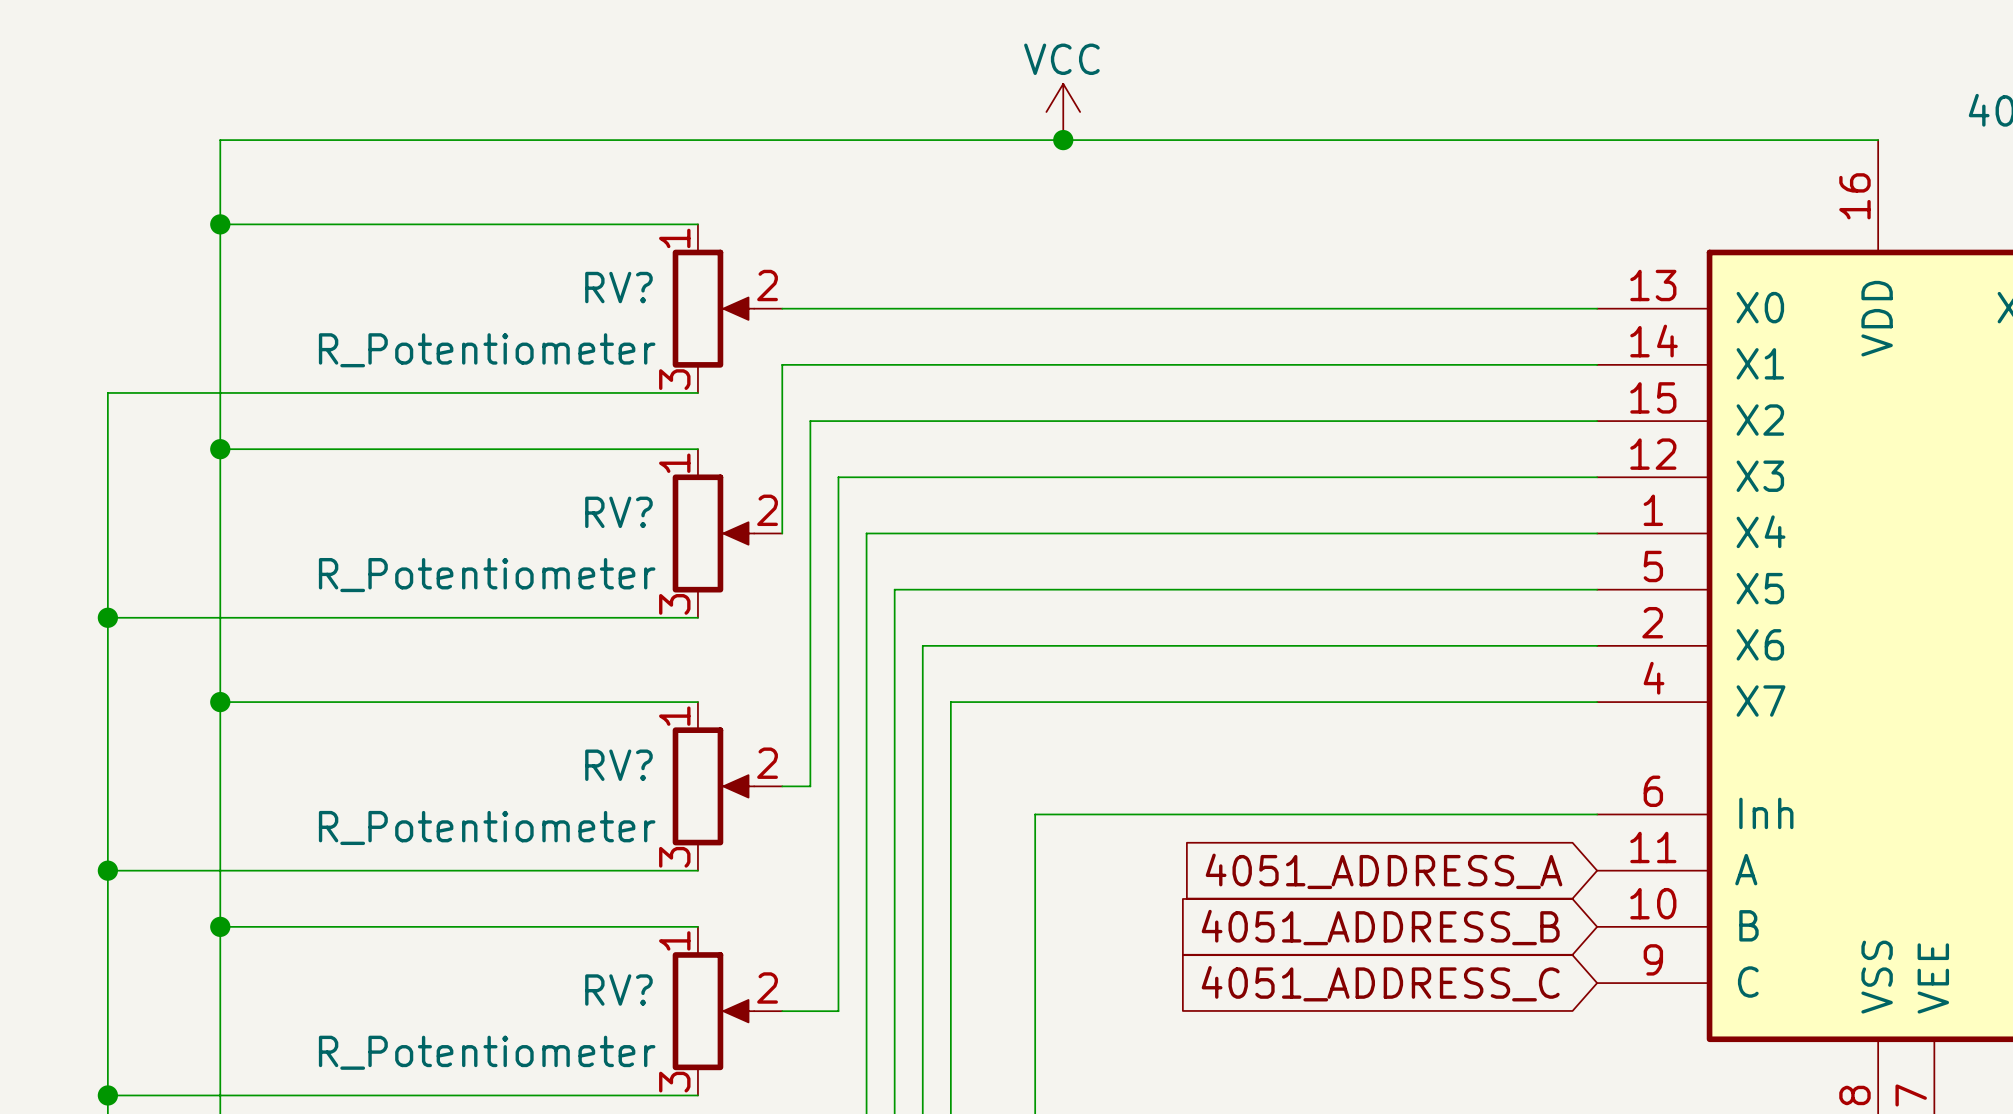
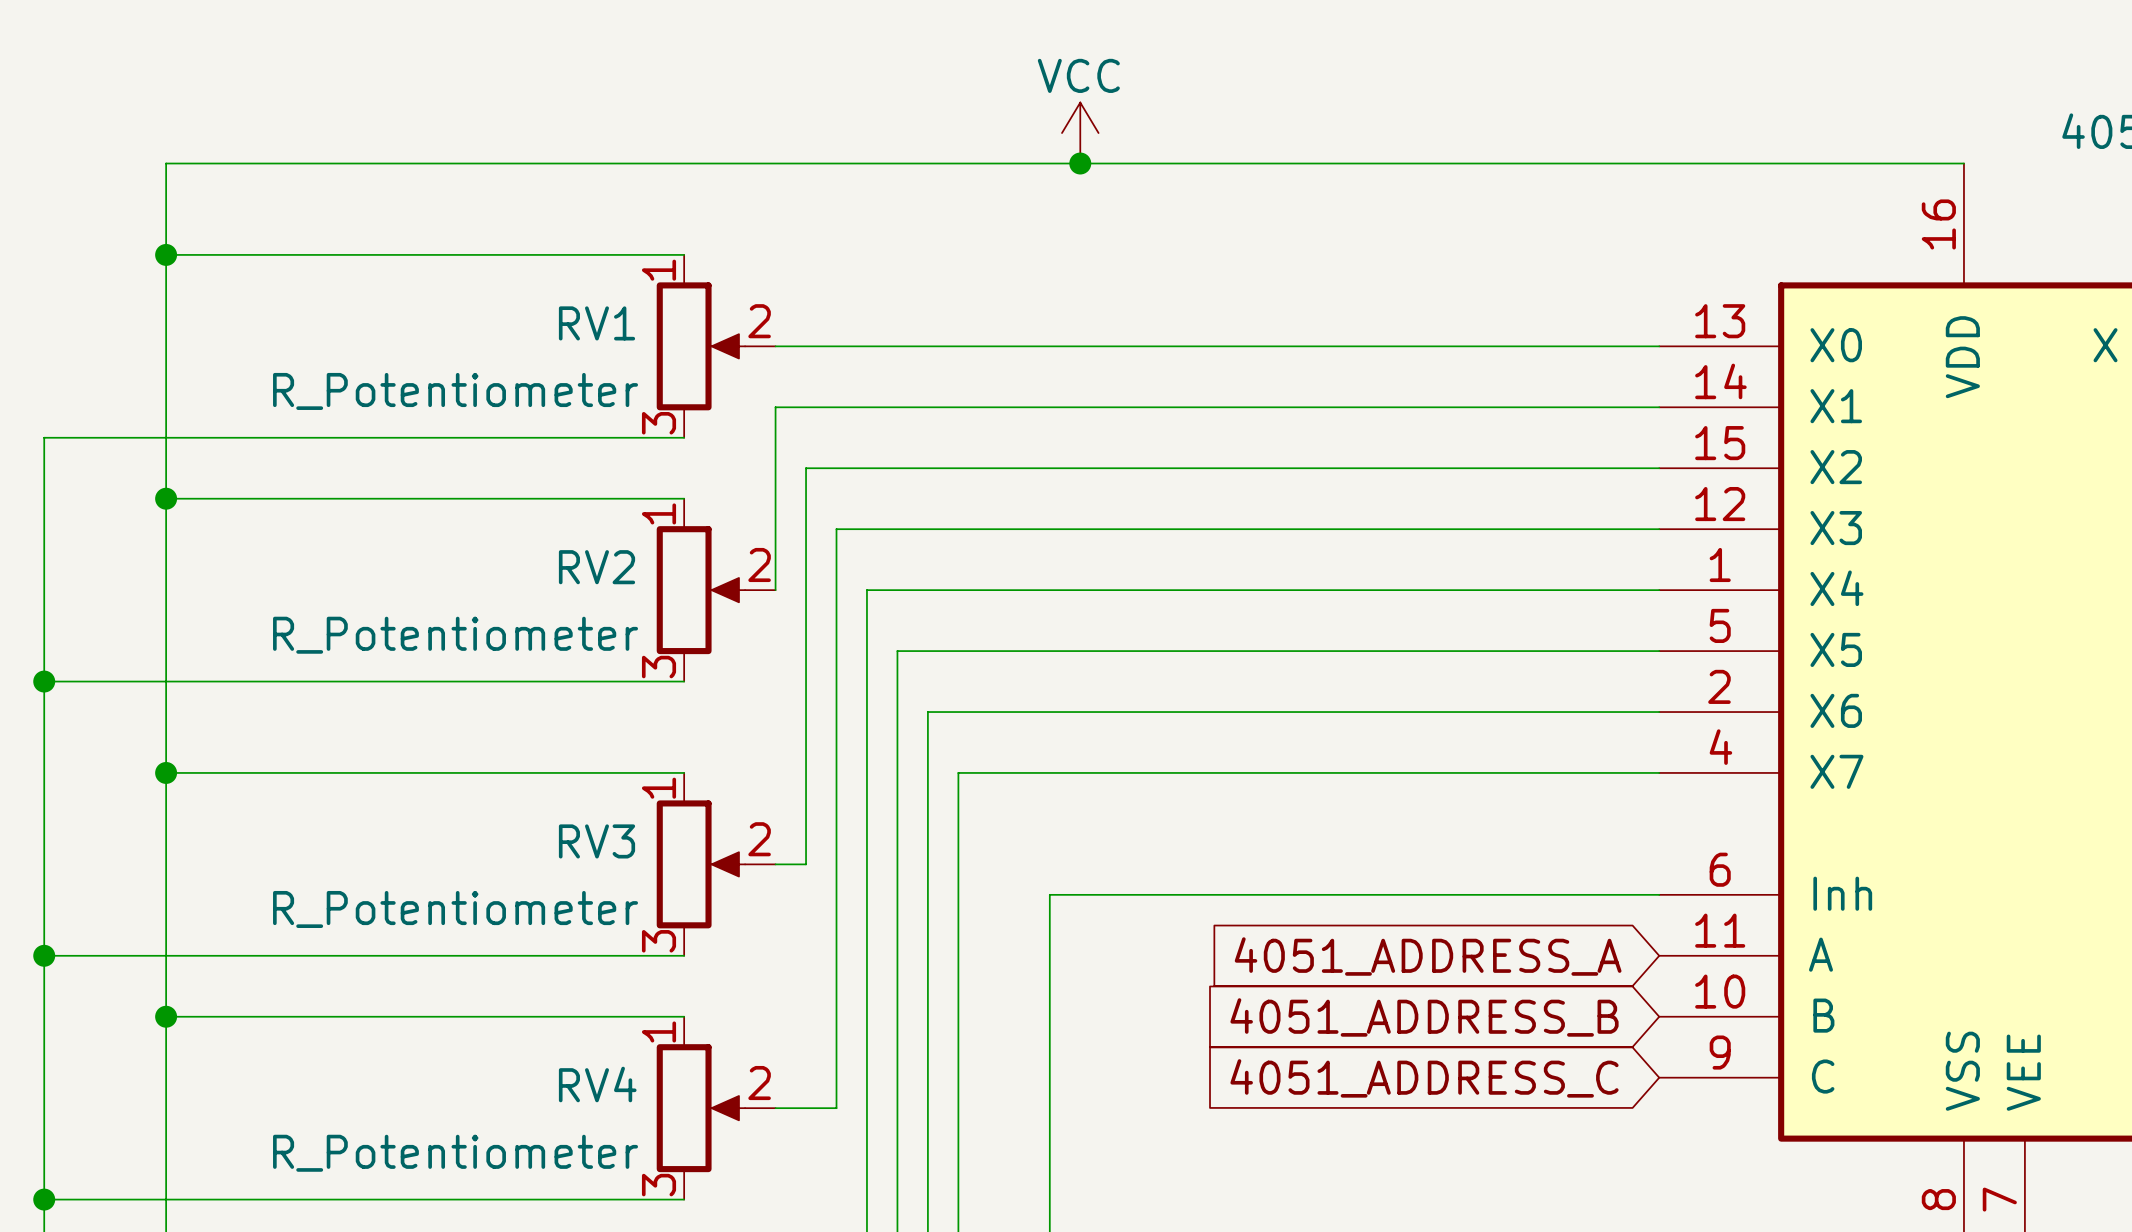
RV? name: RV? (618, 287) -> RV1 (596, 323)
RV? name: RV? (618, 512) -> RV2 (596, 567)
RV? name: RV? (618, 765) -> RV3 (596, 841)
RV? name: RV? (618, 990) -> RV4 (597, 1084)

